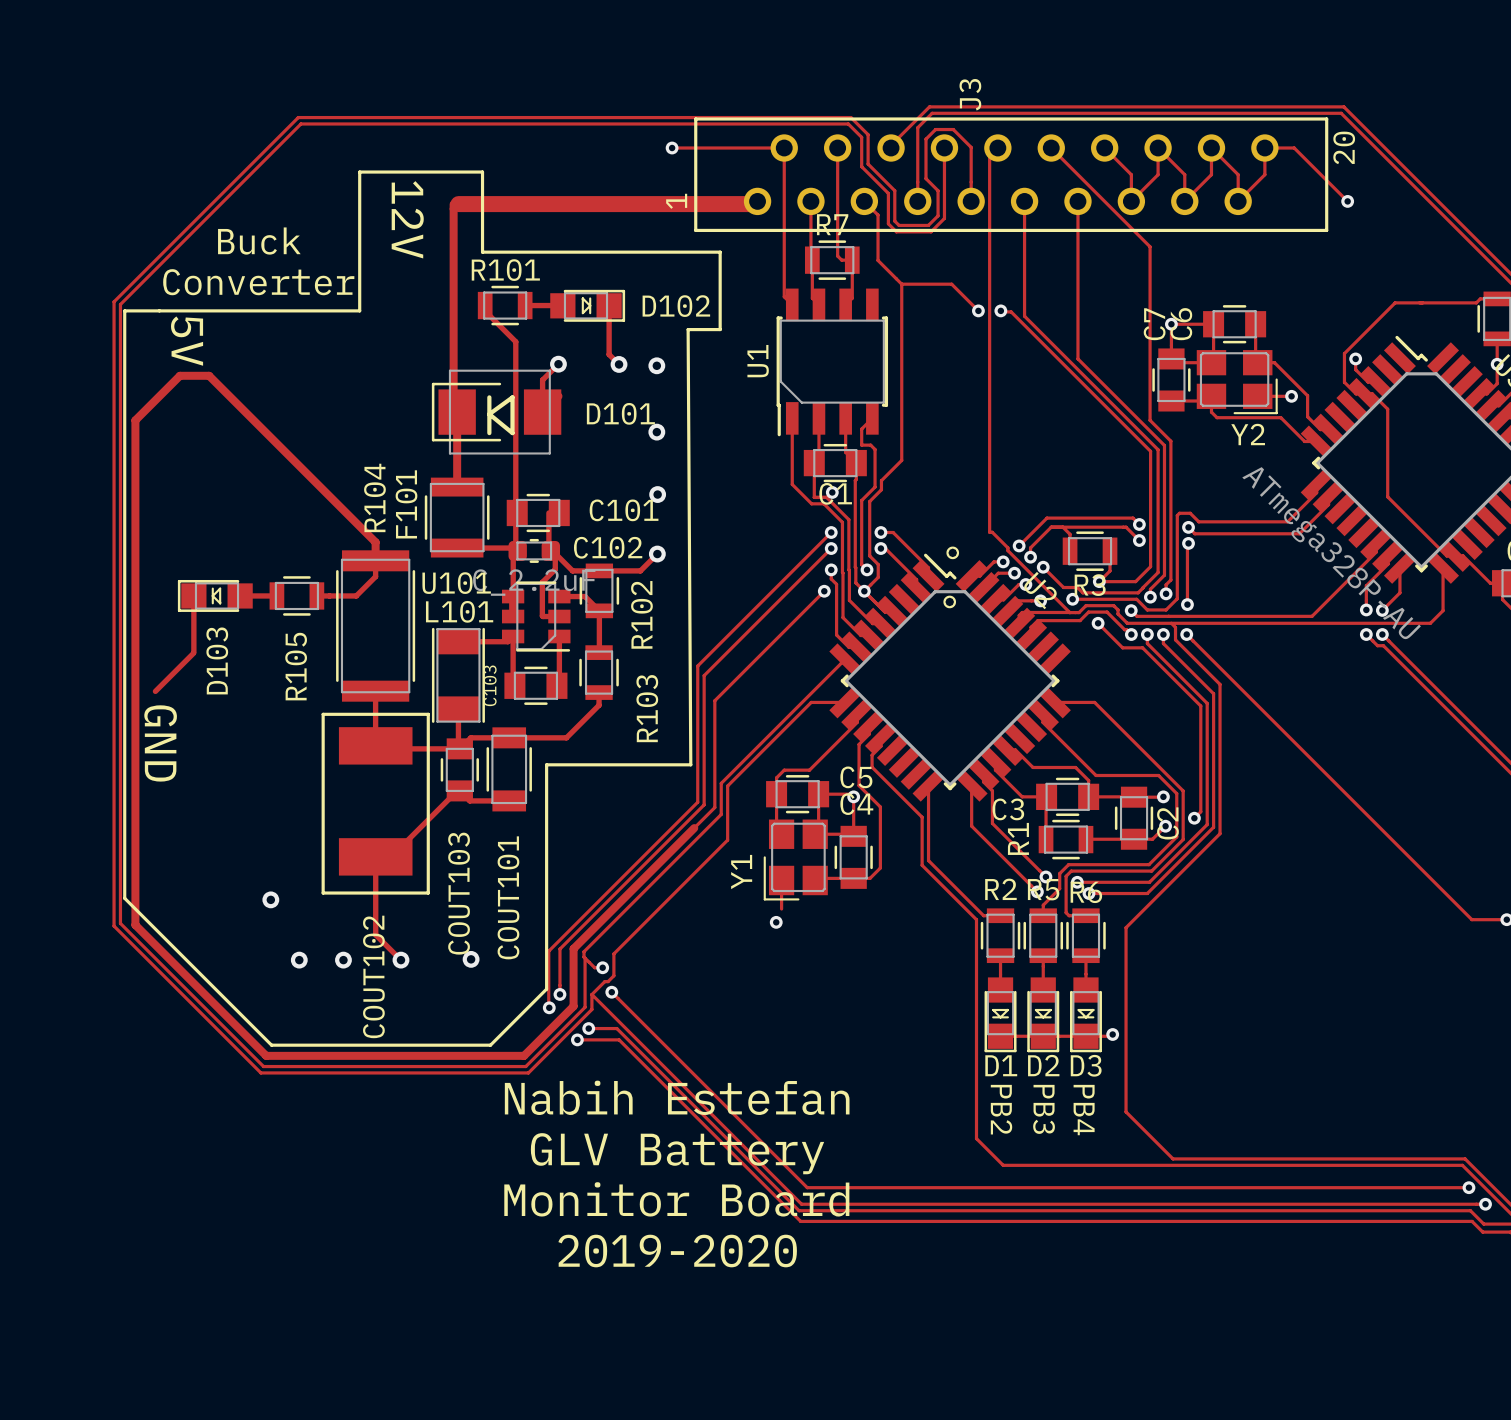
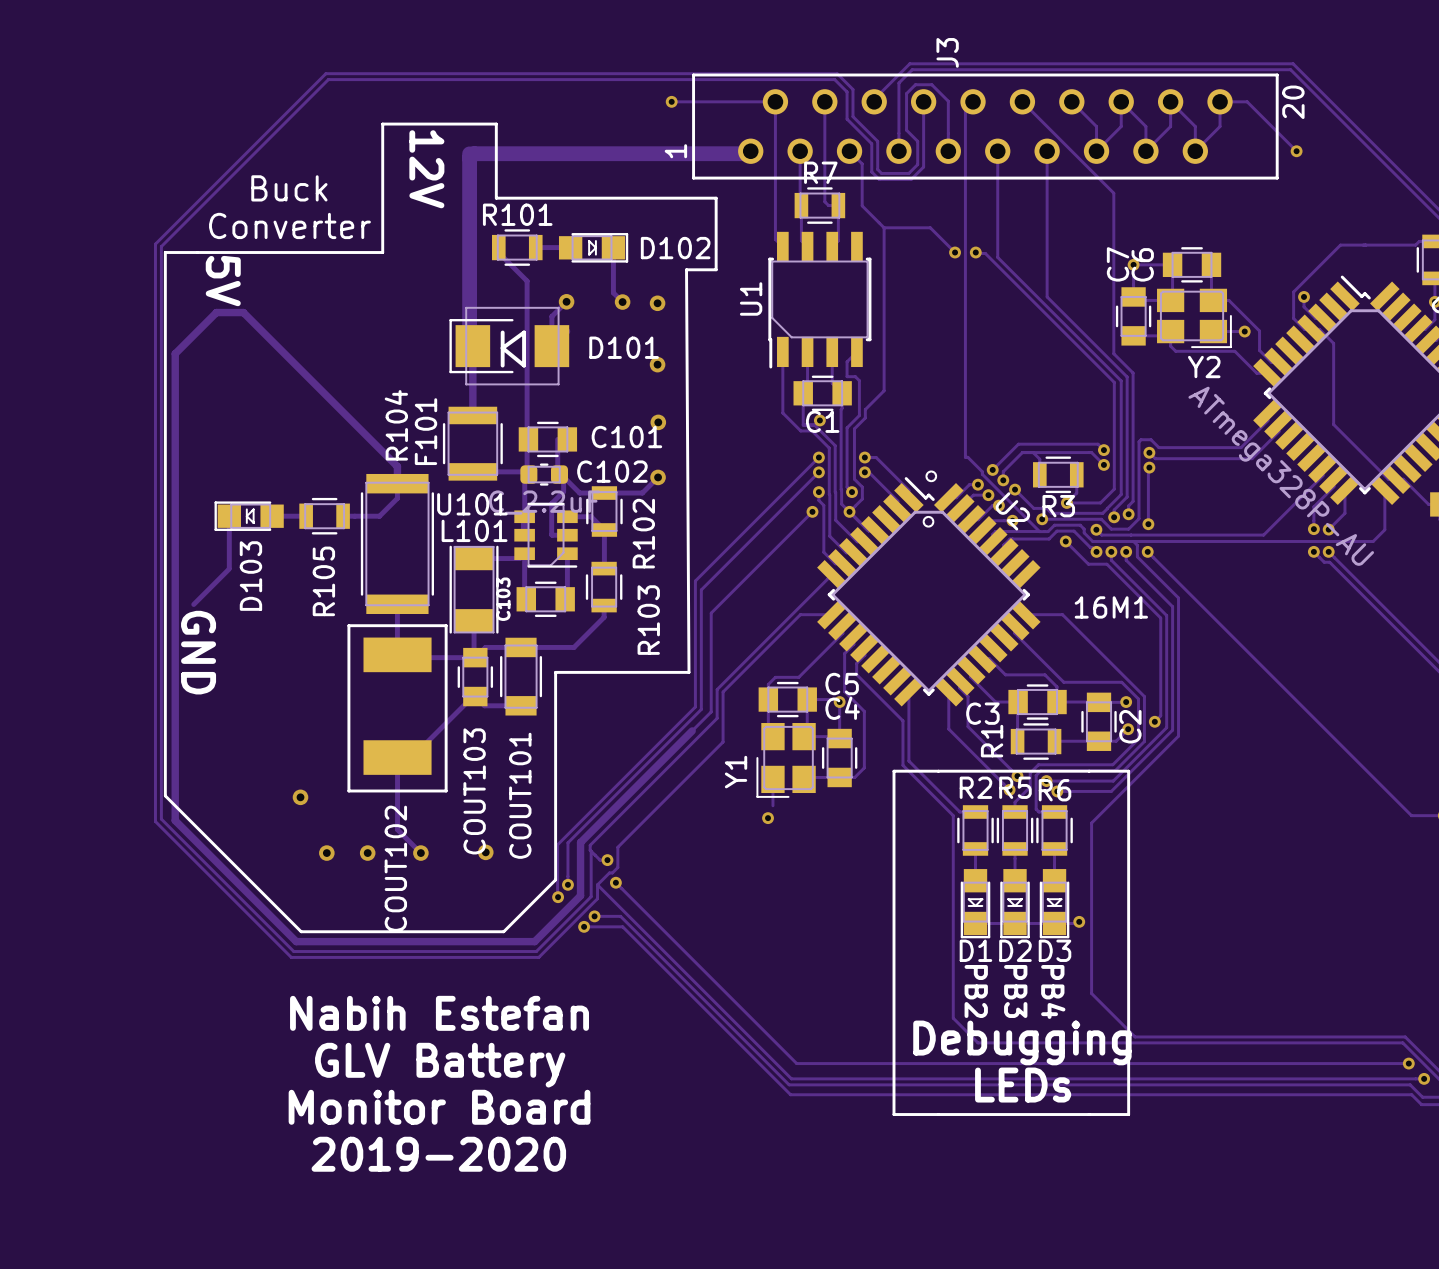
track width: thin (453, 204) (453, 408) -> thick (469, 153) (469, 342)
text: none -> 16M1 (1111, 607)
line: none -> (893, 771) (1128, 771) (1128, 1114) (893, 1114) (893, 771)
text position: Nabih Estefan (677, 1097) -> Nabih Estefan (439, 1013)
text position: GLV Battery (677, 1153) -> GLV Battery (440, 1065)
text: none -> Debugging (1022, 1042)
text position: Monitor Board (676, 1199) -> Monitor Board (439, 1107)
text: none -> LEDs (1023, 1085)
text position: 2019-2020 (677, 1251) -> 2019-2020 (438, 1154)

